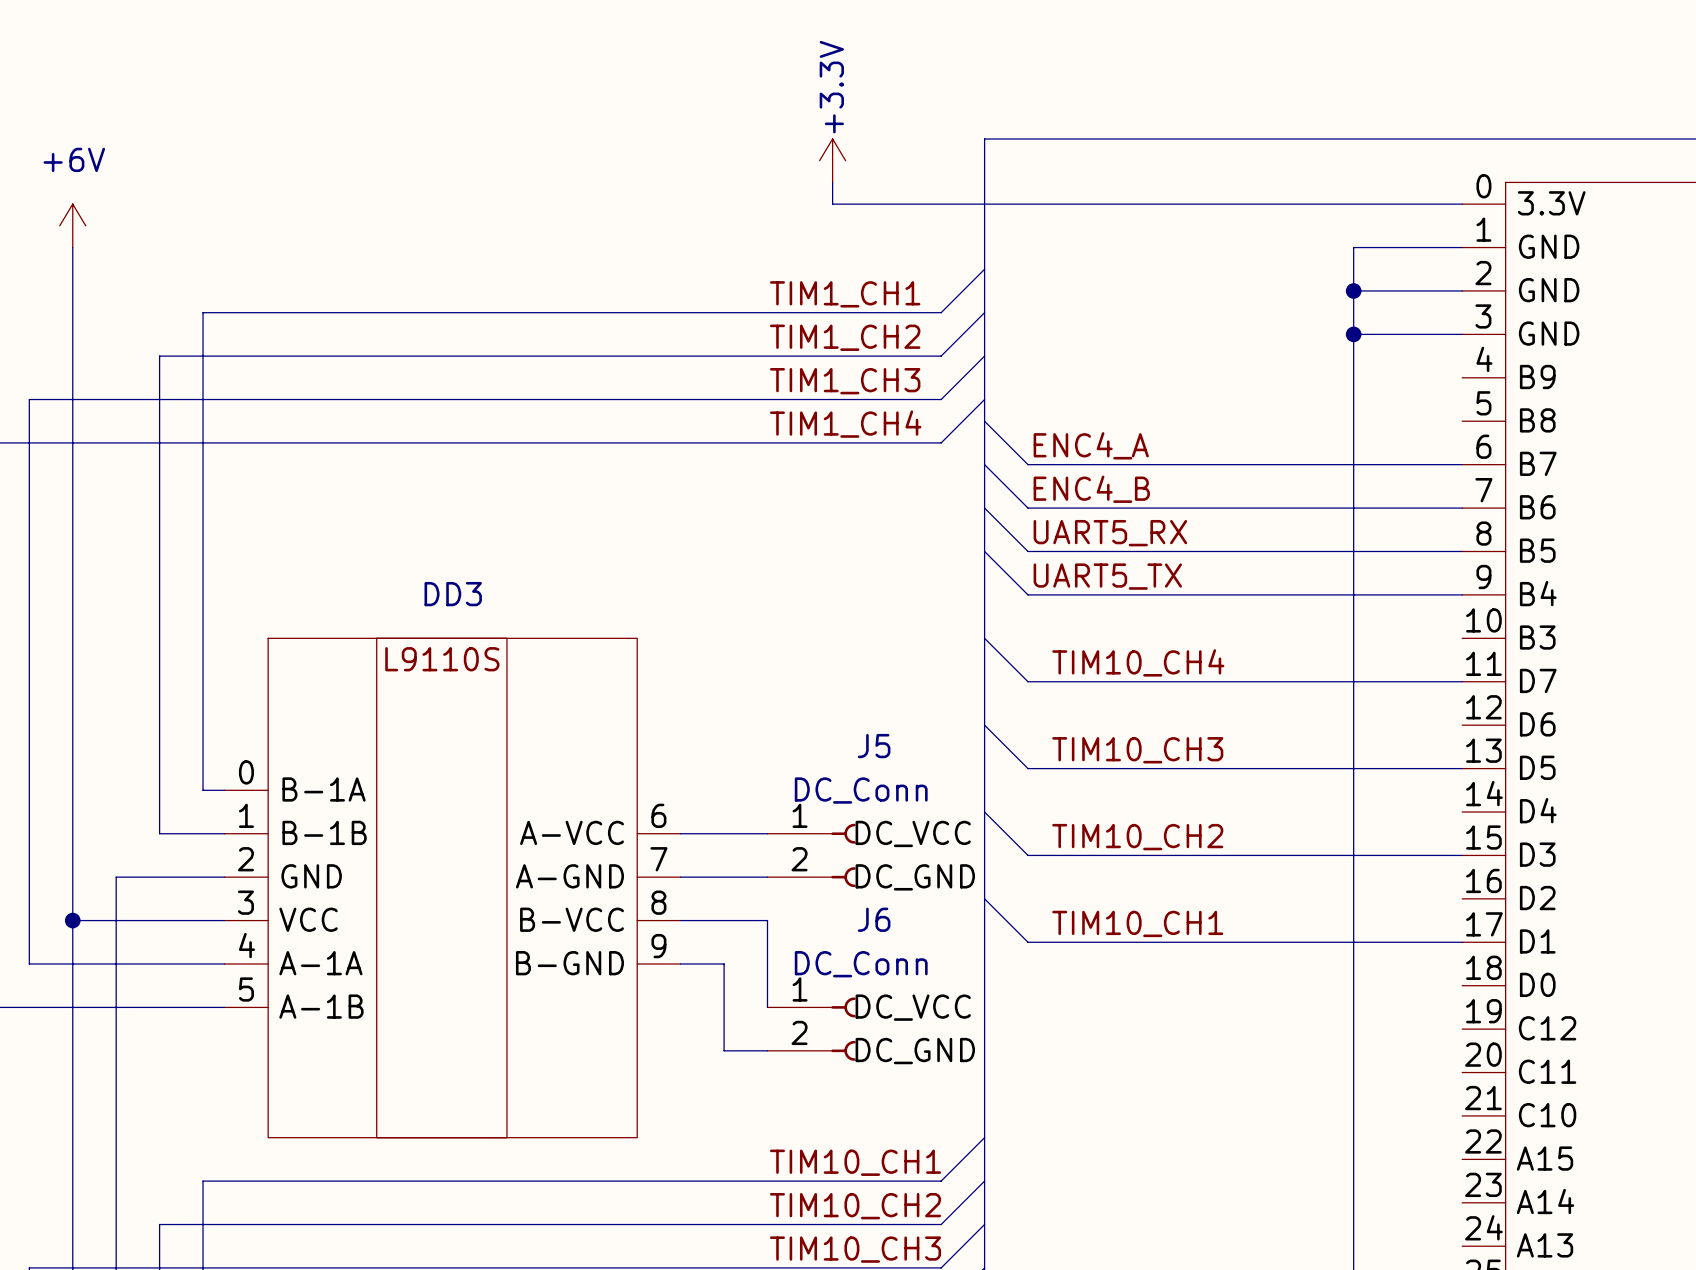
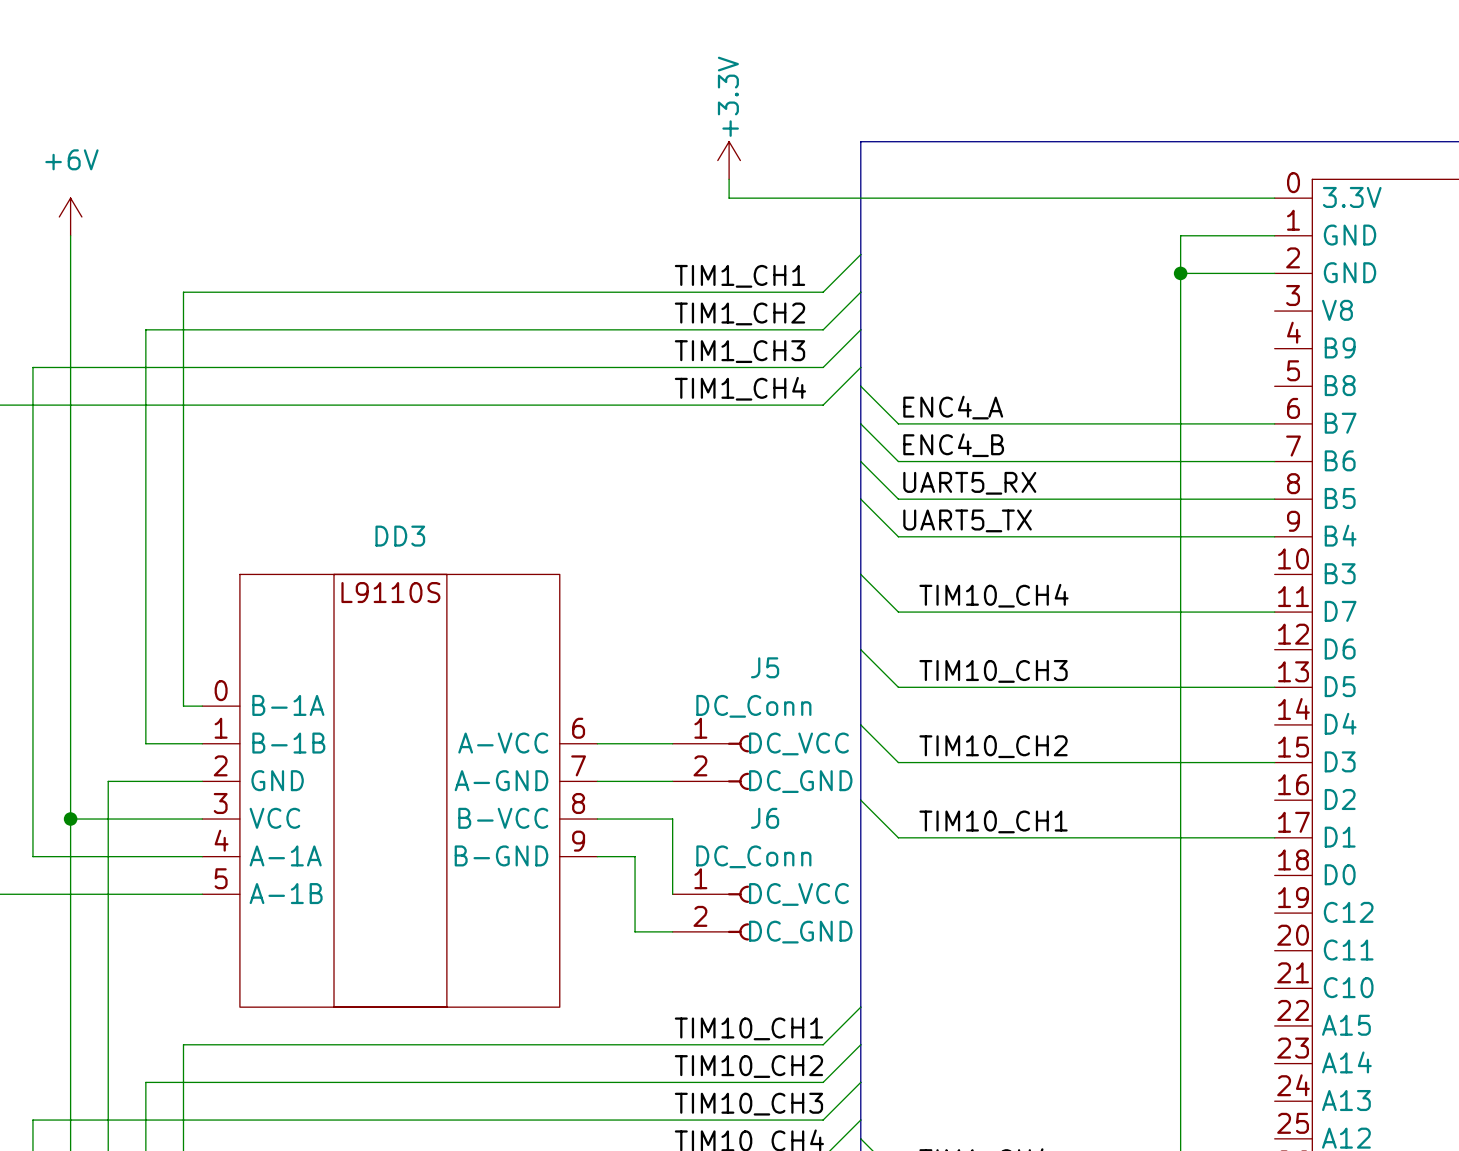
part pin name: GND (1549, 333) -> V8 (1337, 310)
wire: (1353, 334) (1462, 334) -> none
junction: (1353, 334) -> none

